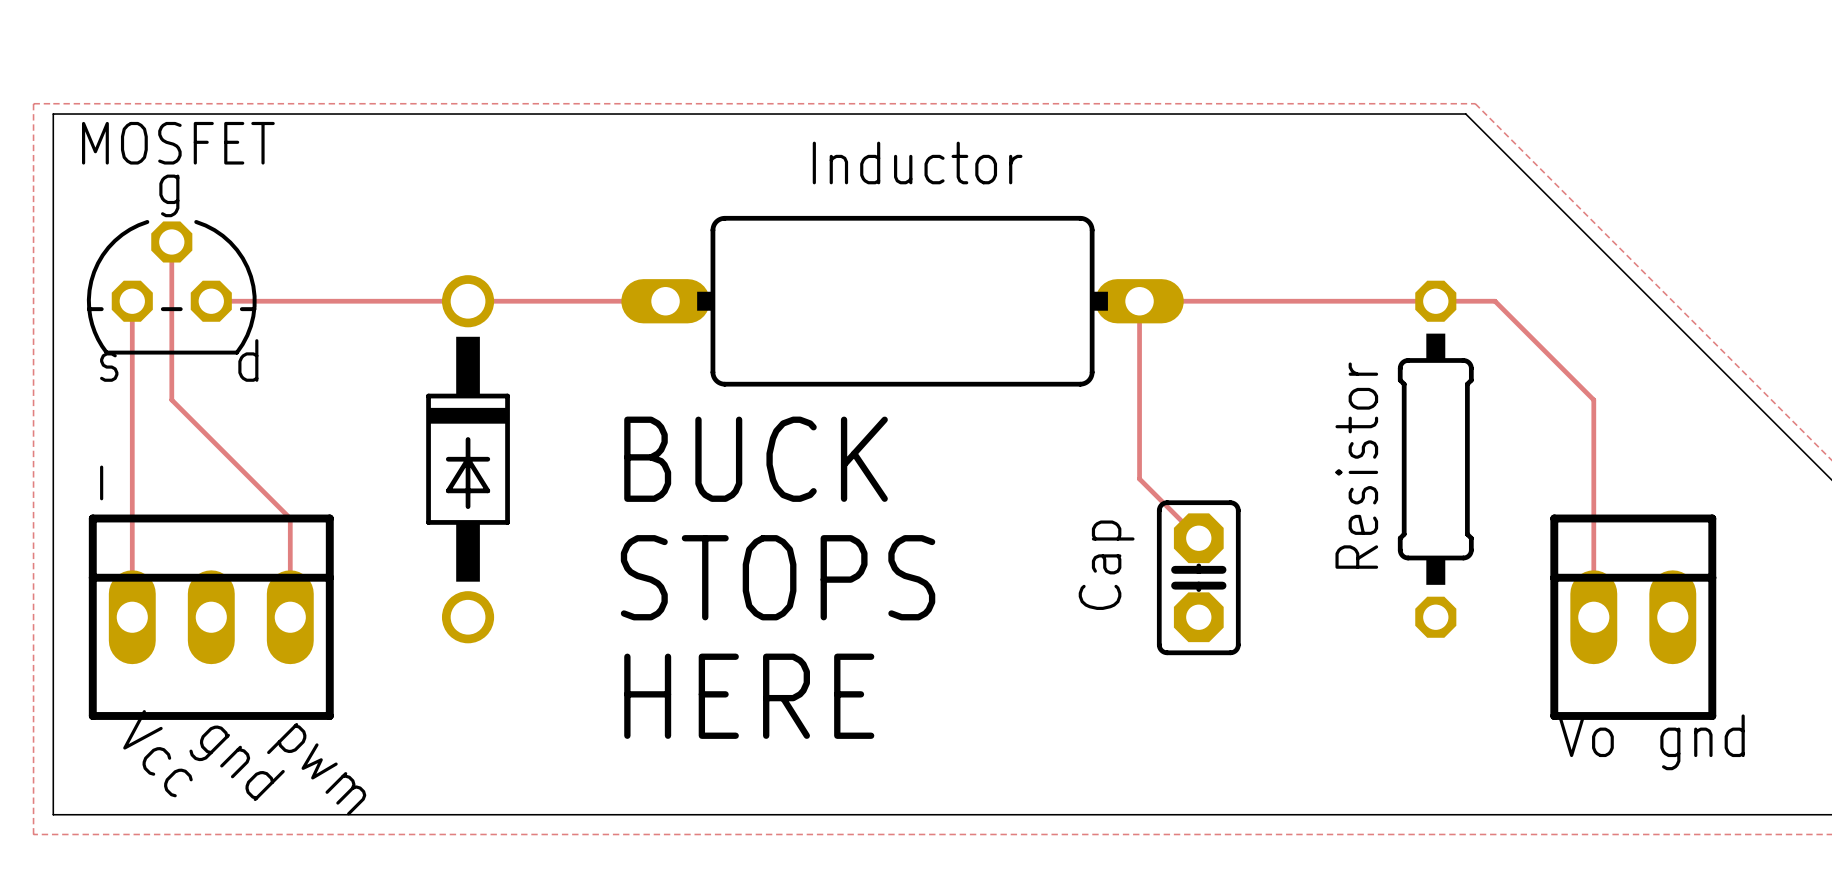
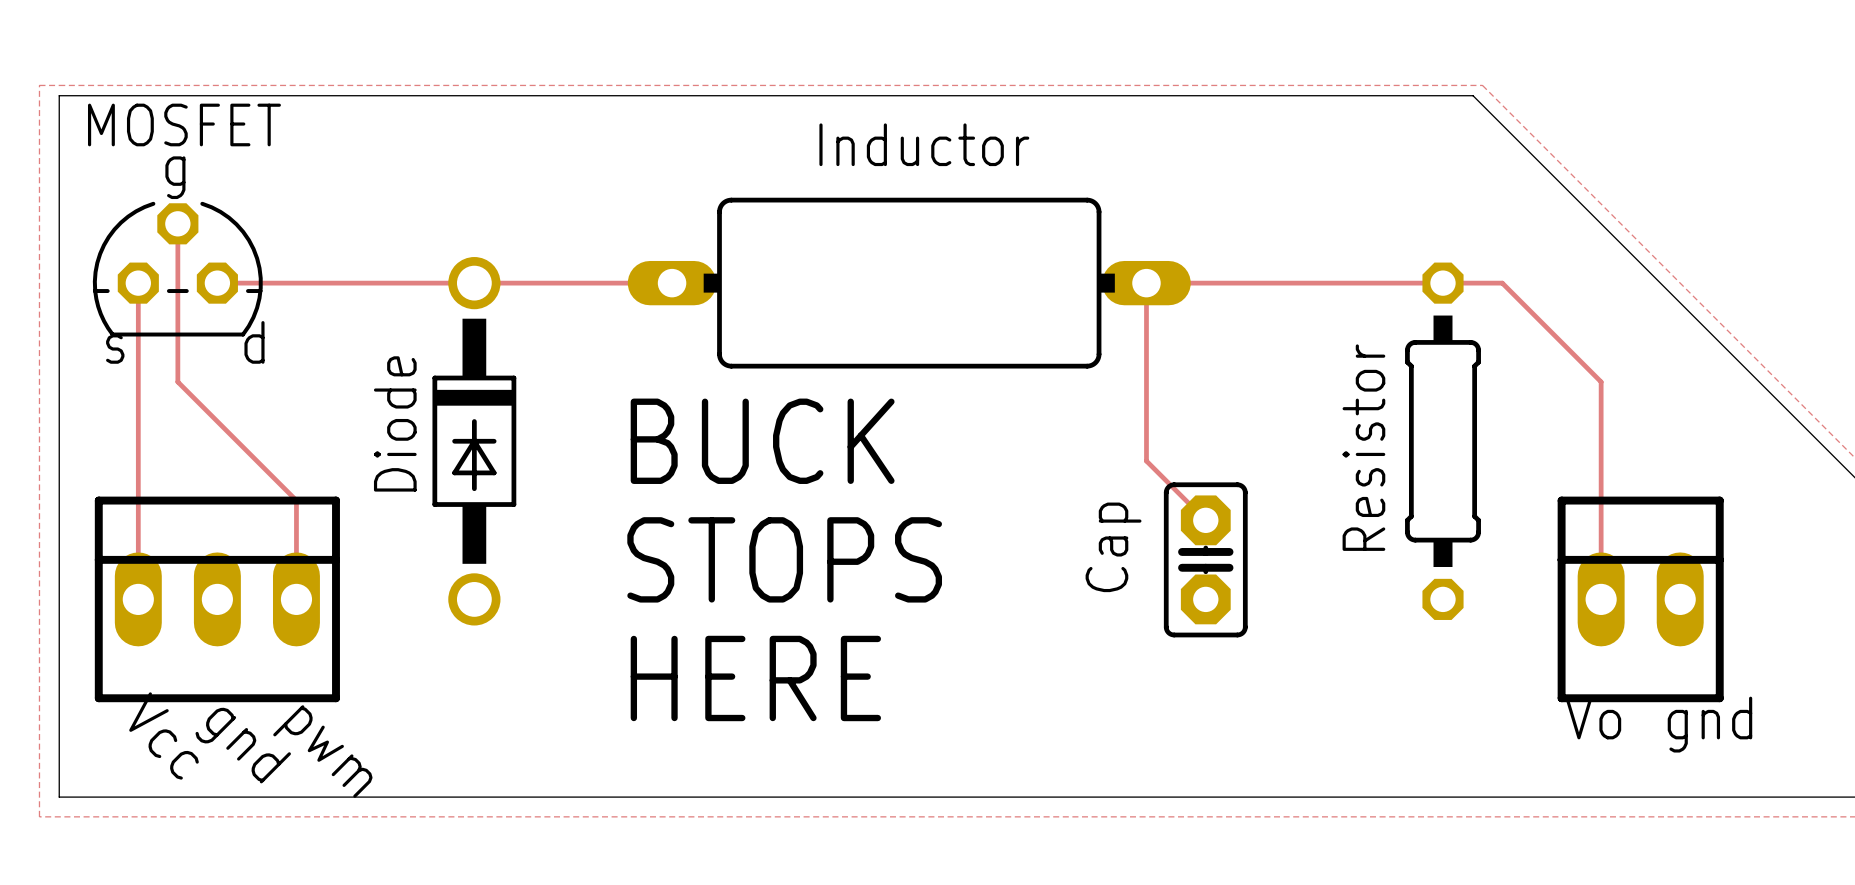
text: none -> Diode (395, 423)
I name: I (101, 482) -> none

